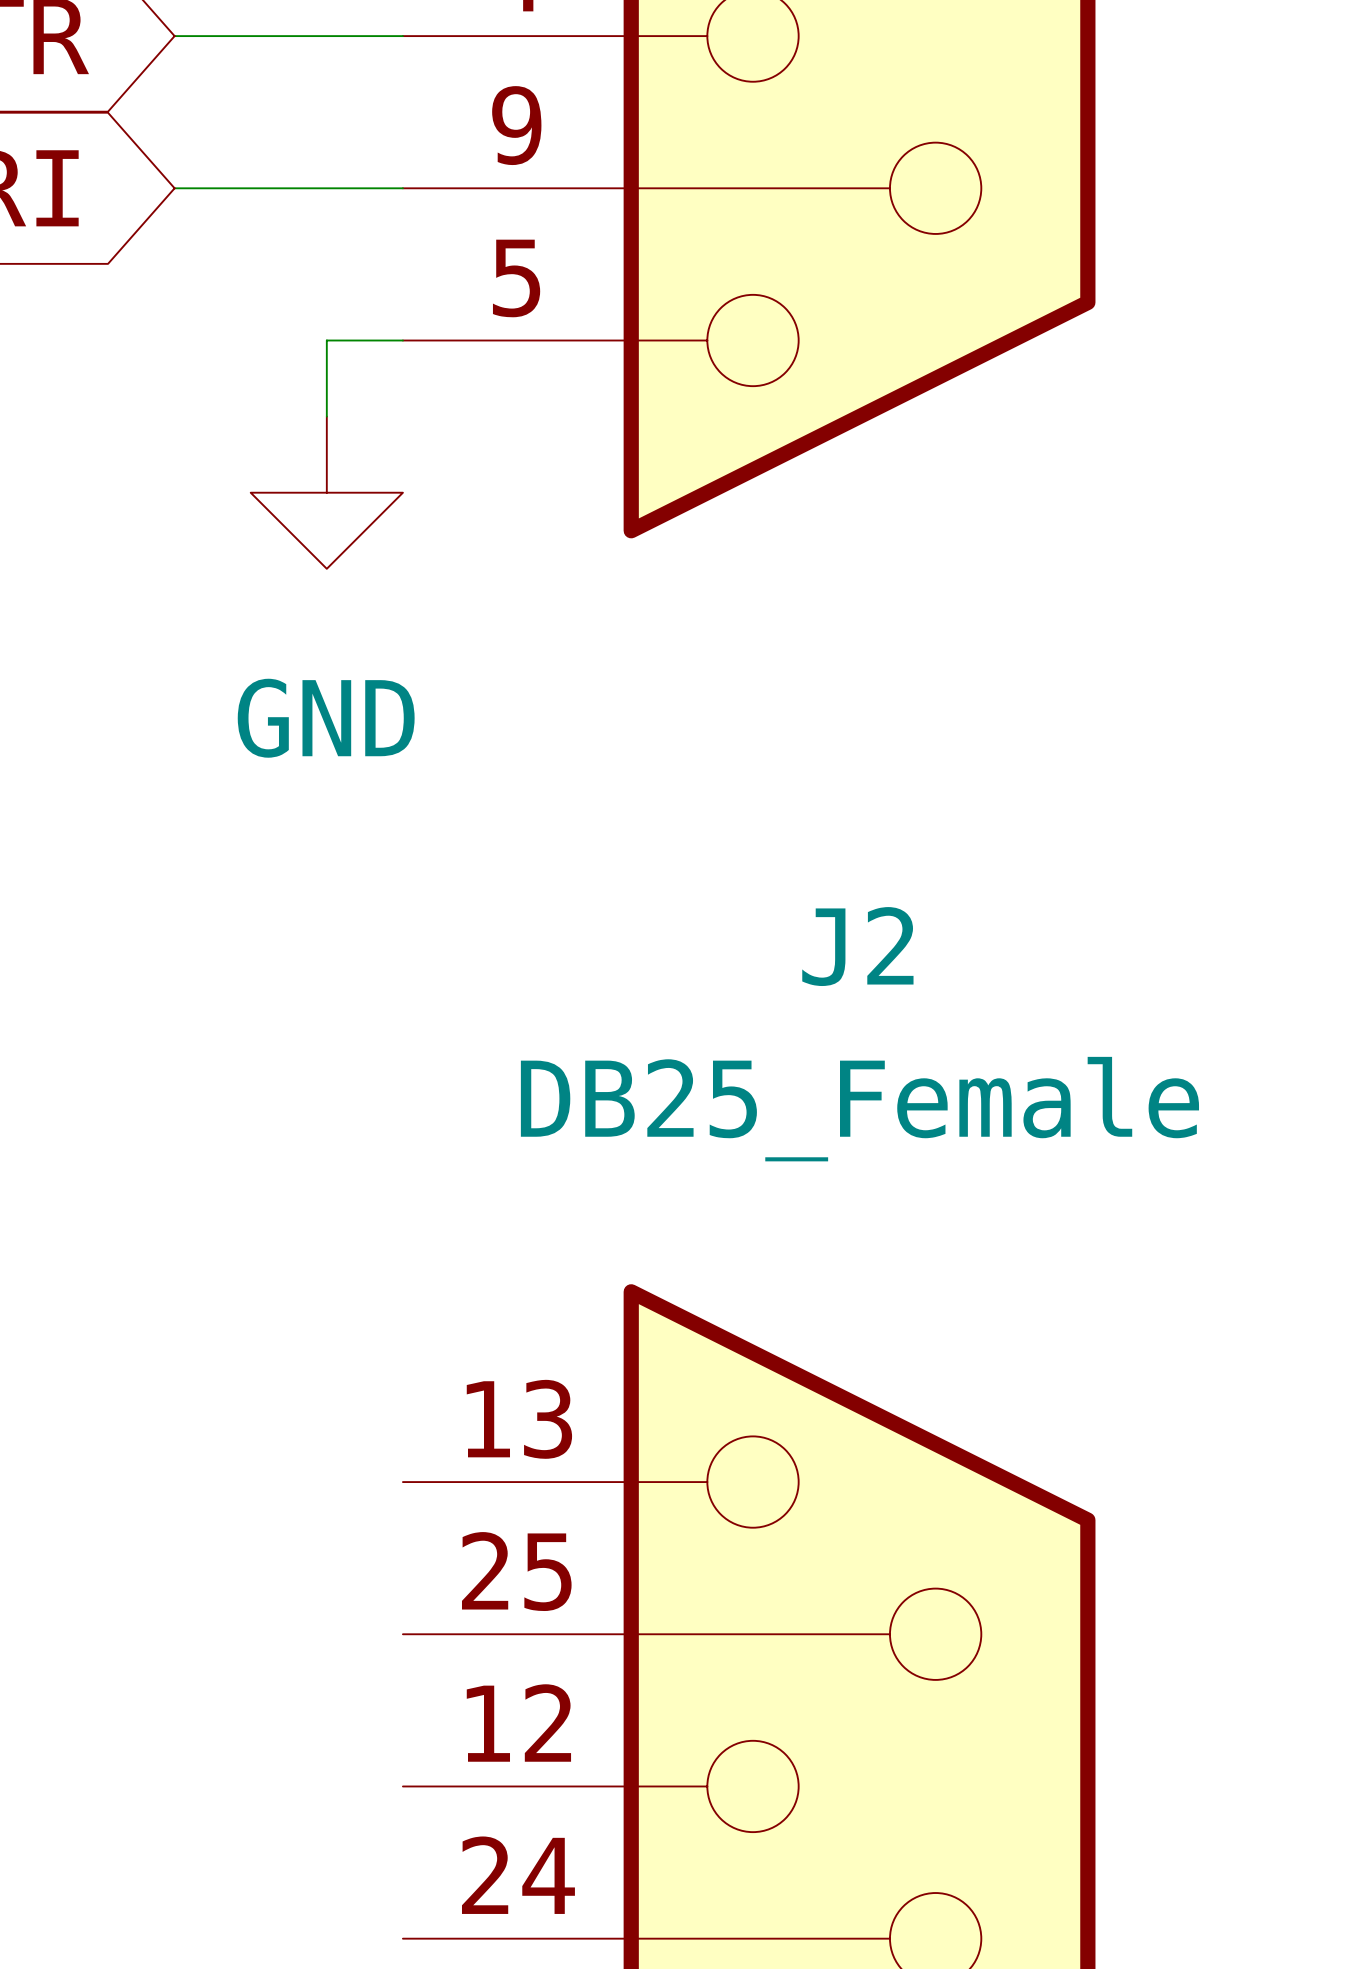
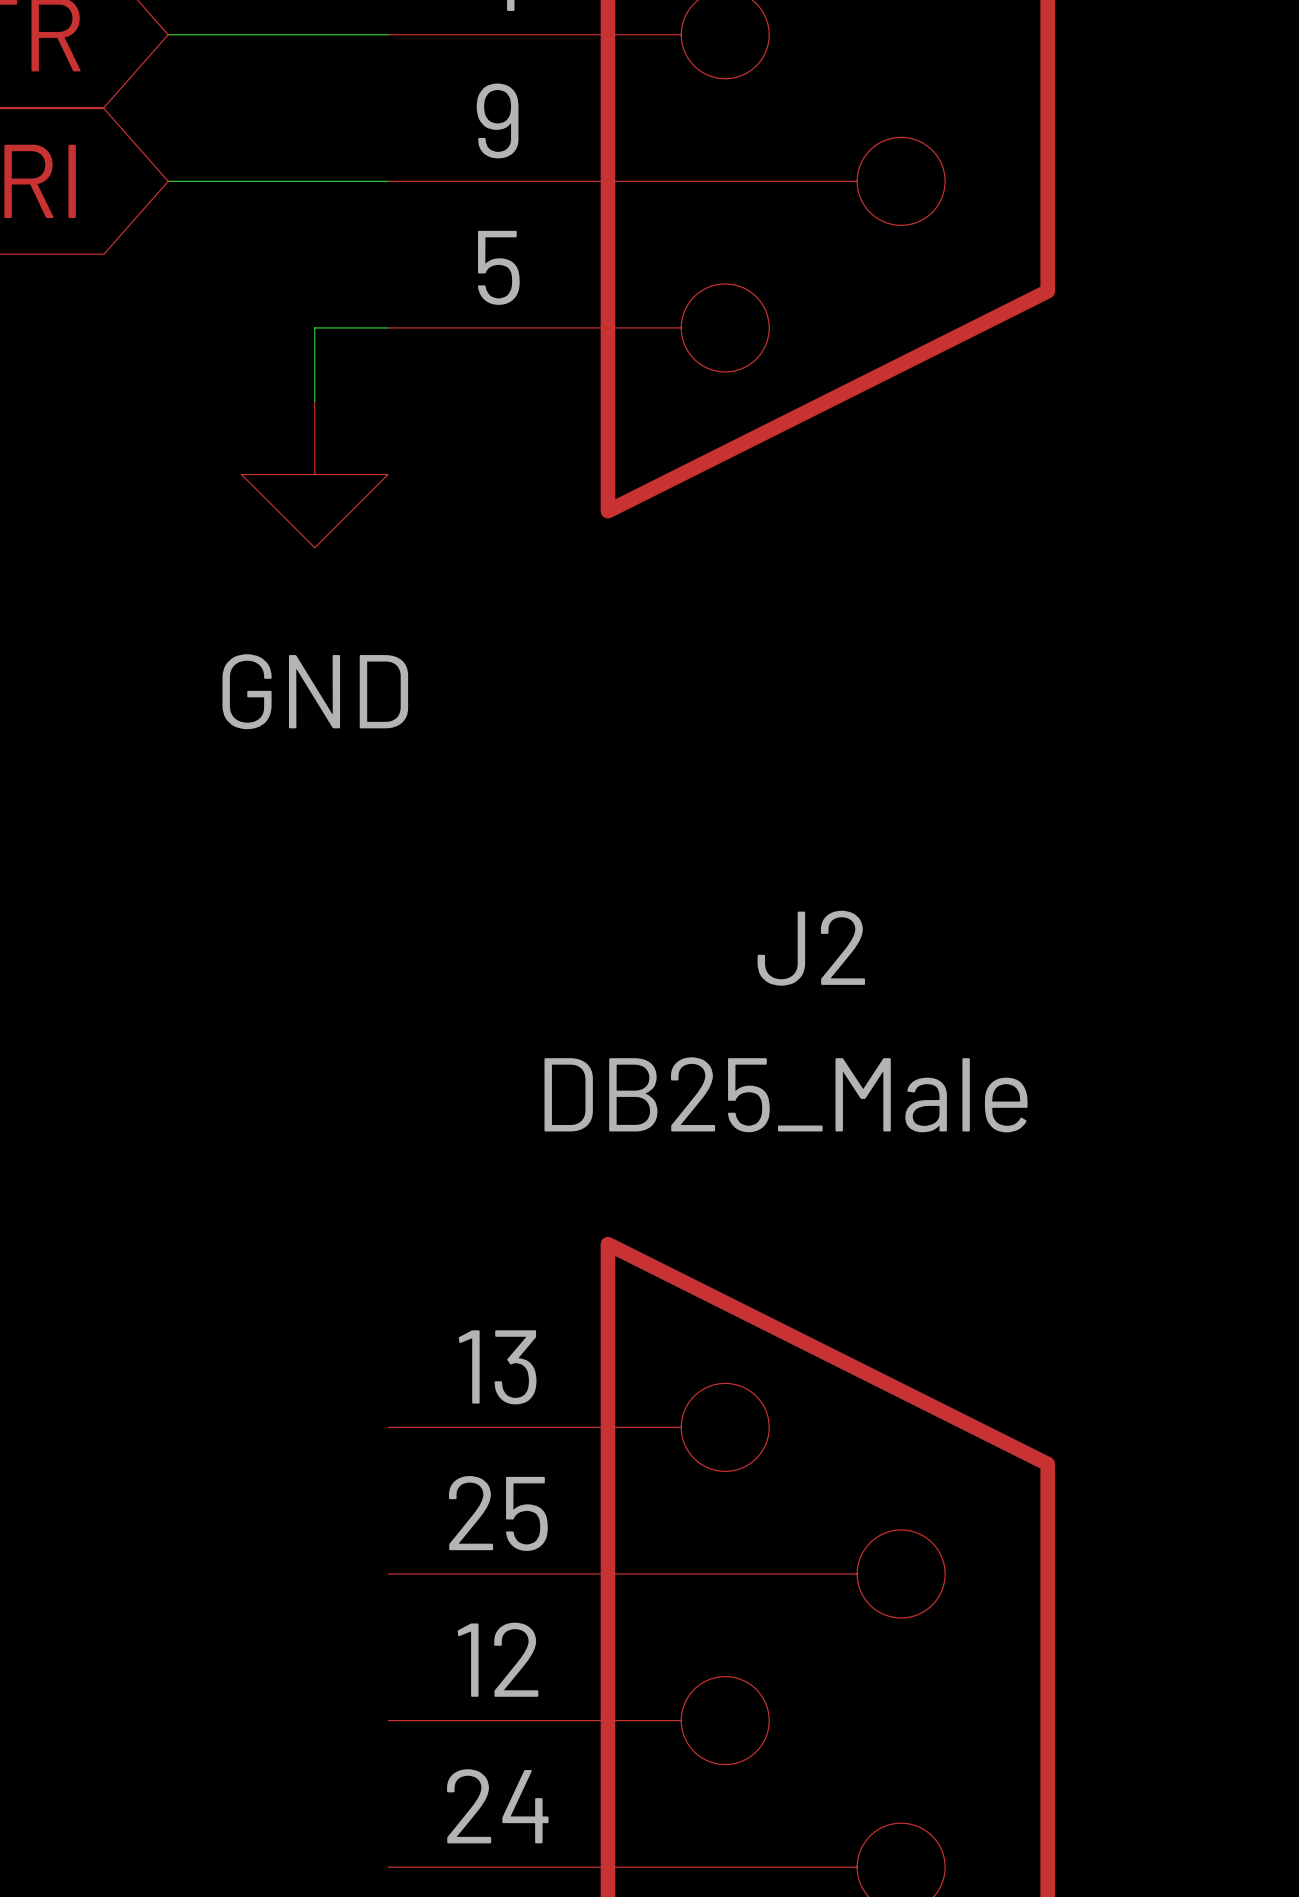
J2 name position: J2 (857, 946) -> J2 (811, 948)
J2 value: DB25_Female (859, 1109) -> DB25_Male (786, 1094)

